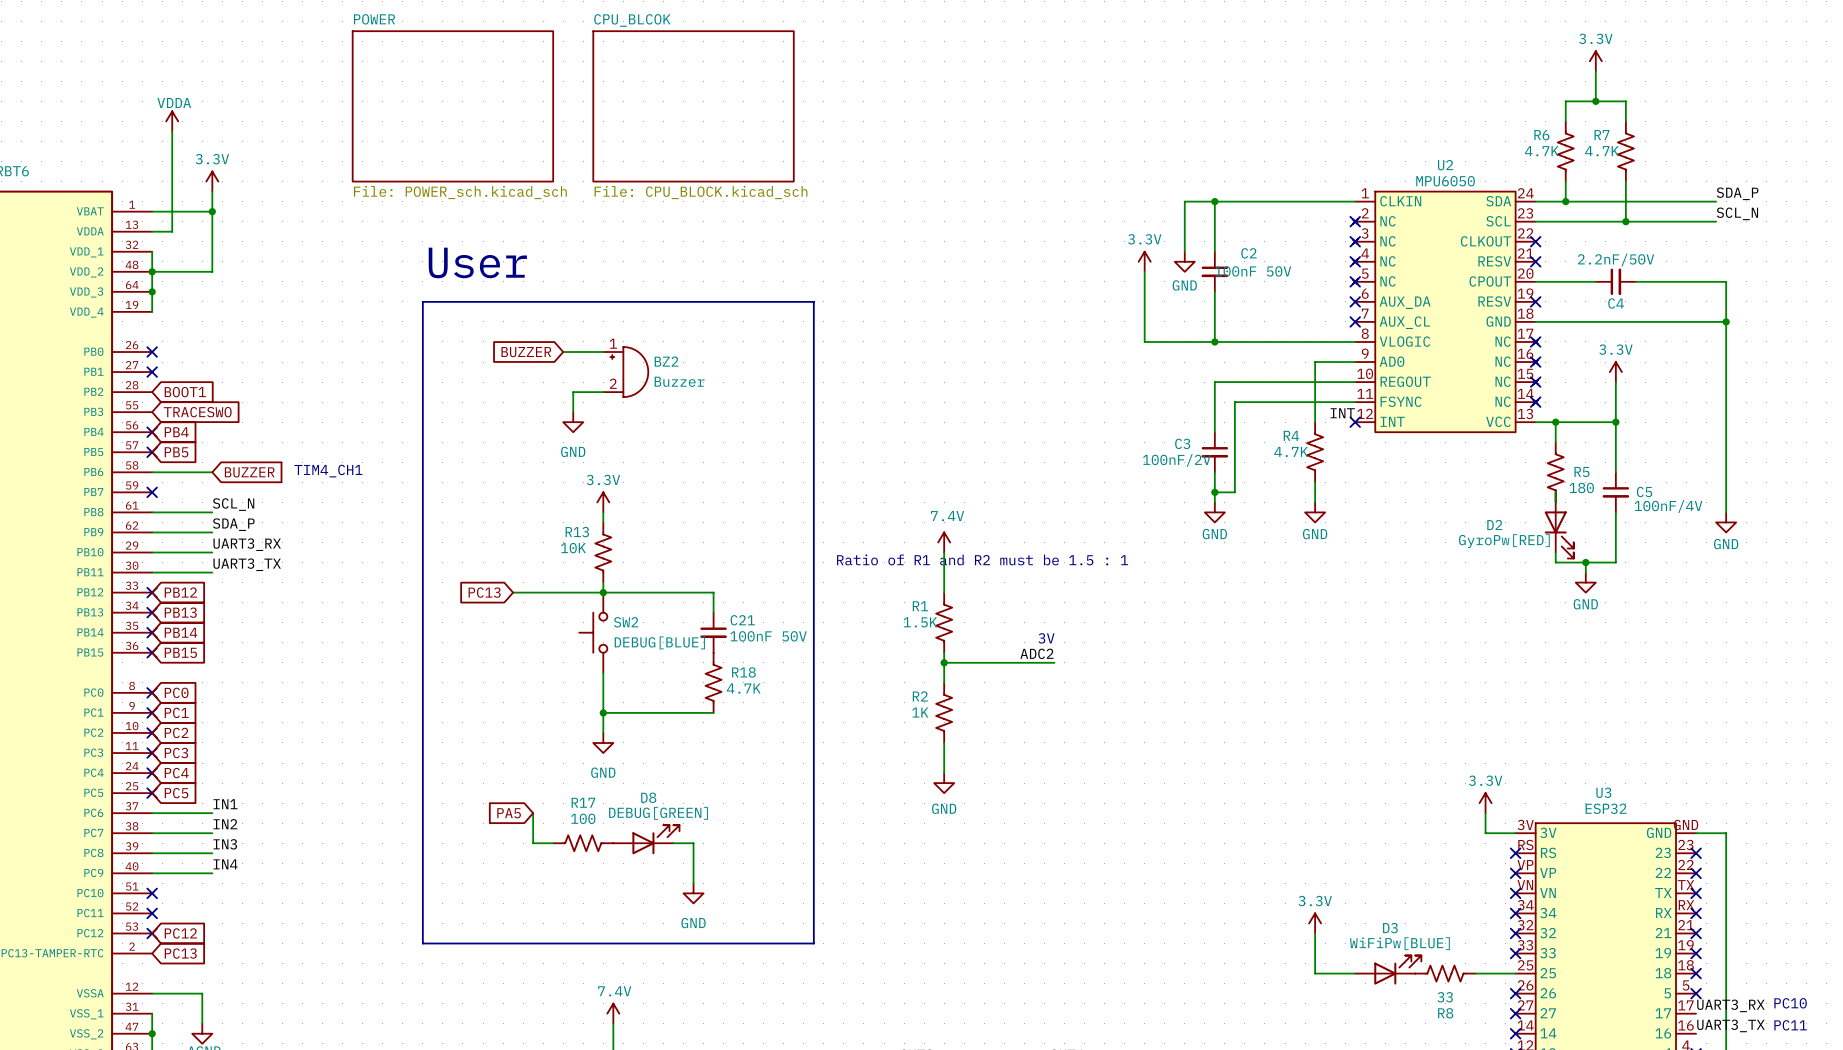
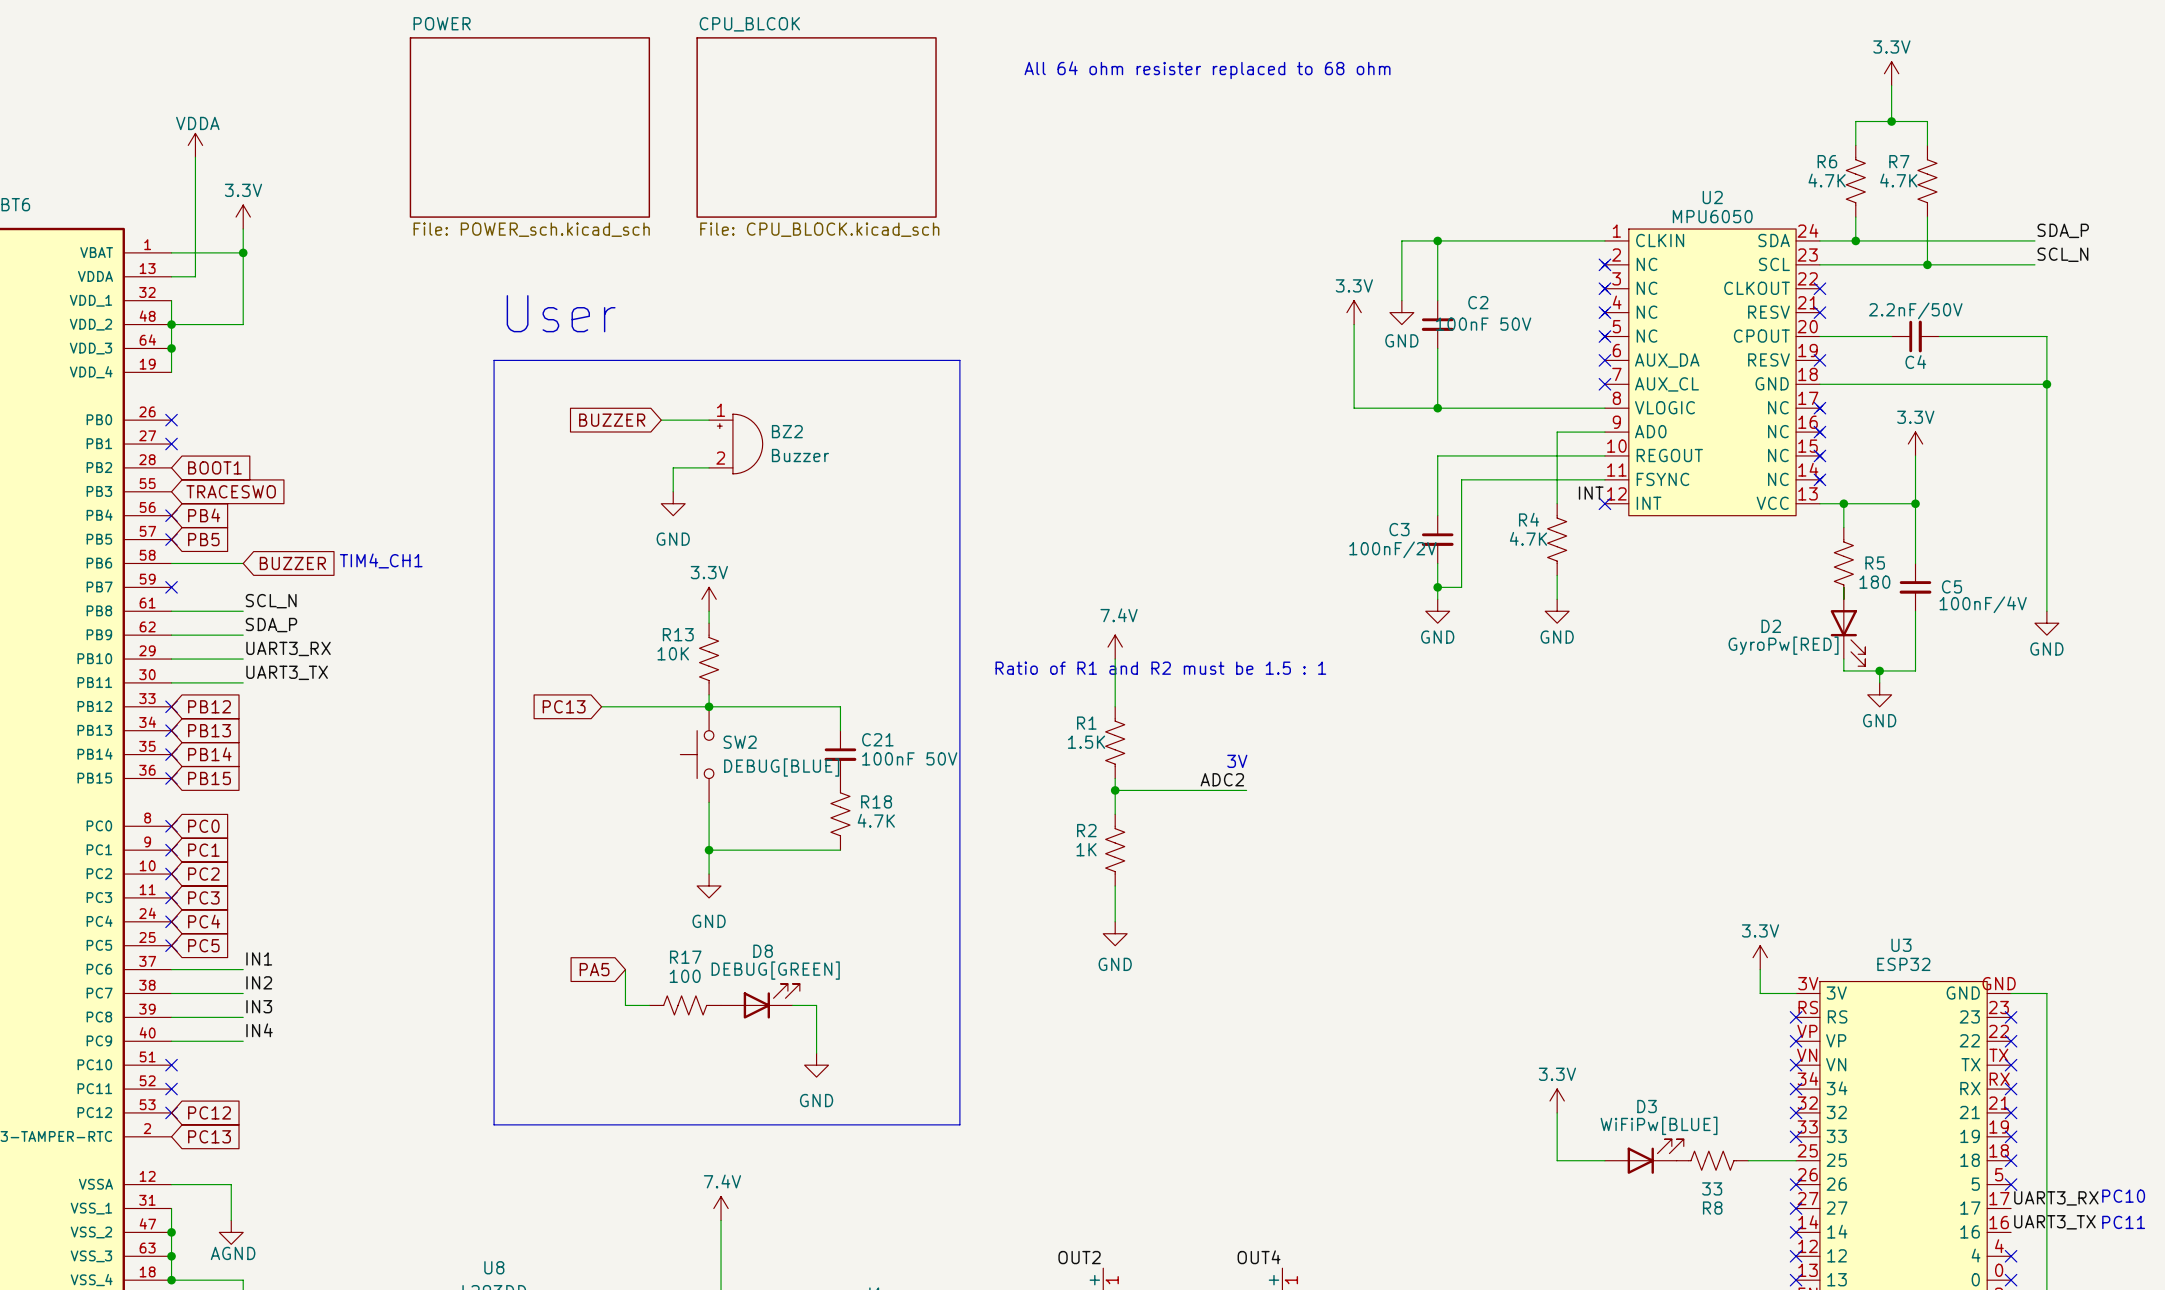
text: none -> All 64 ohm resister replaced to 68 ohm (1207, 70)

